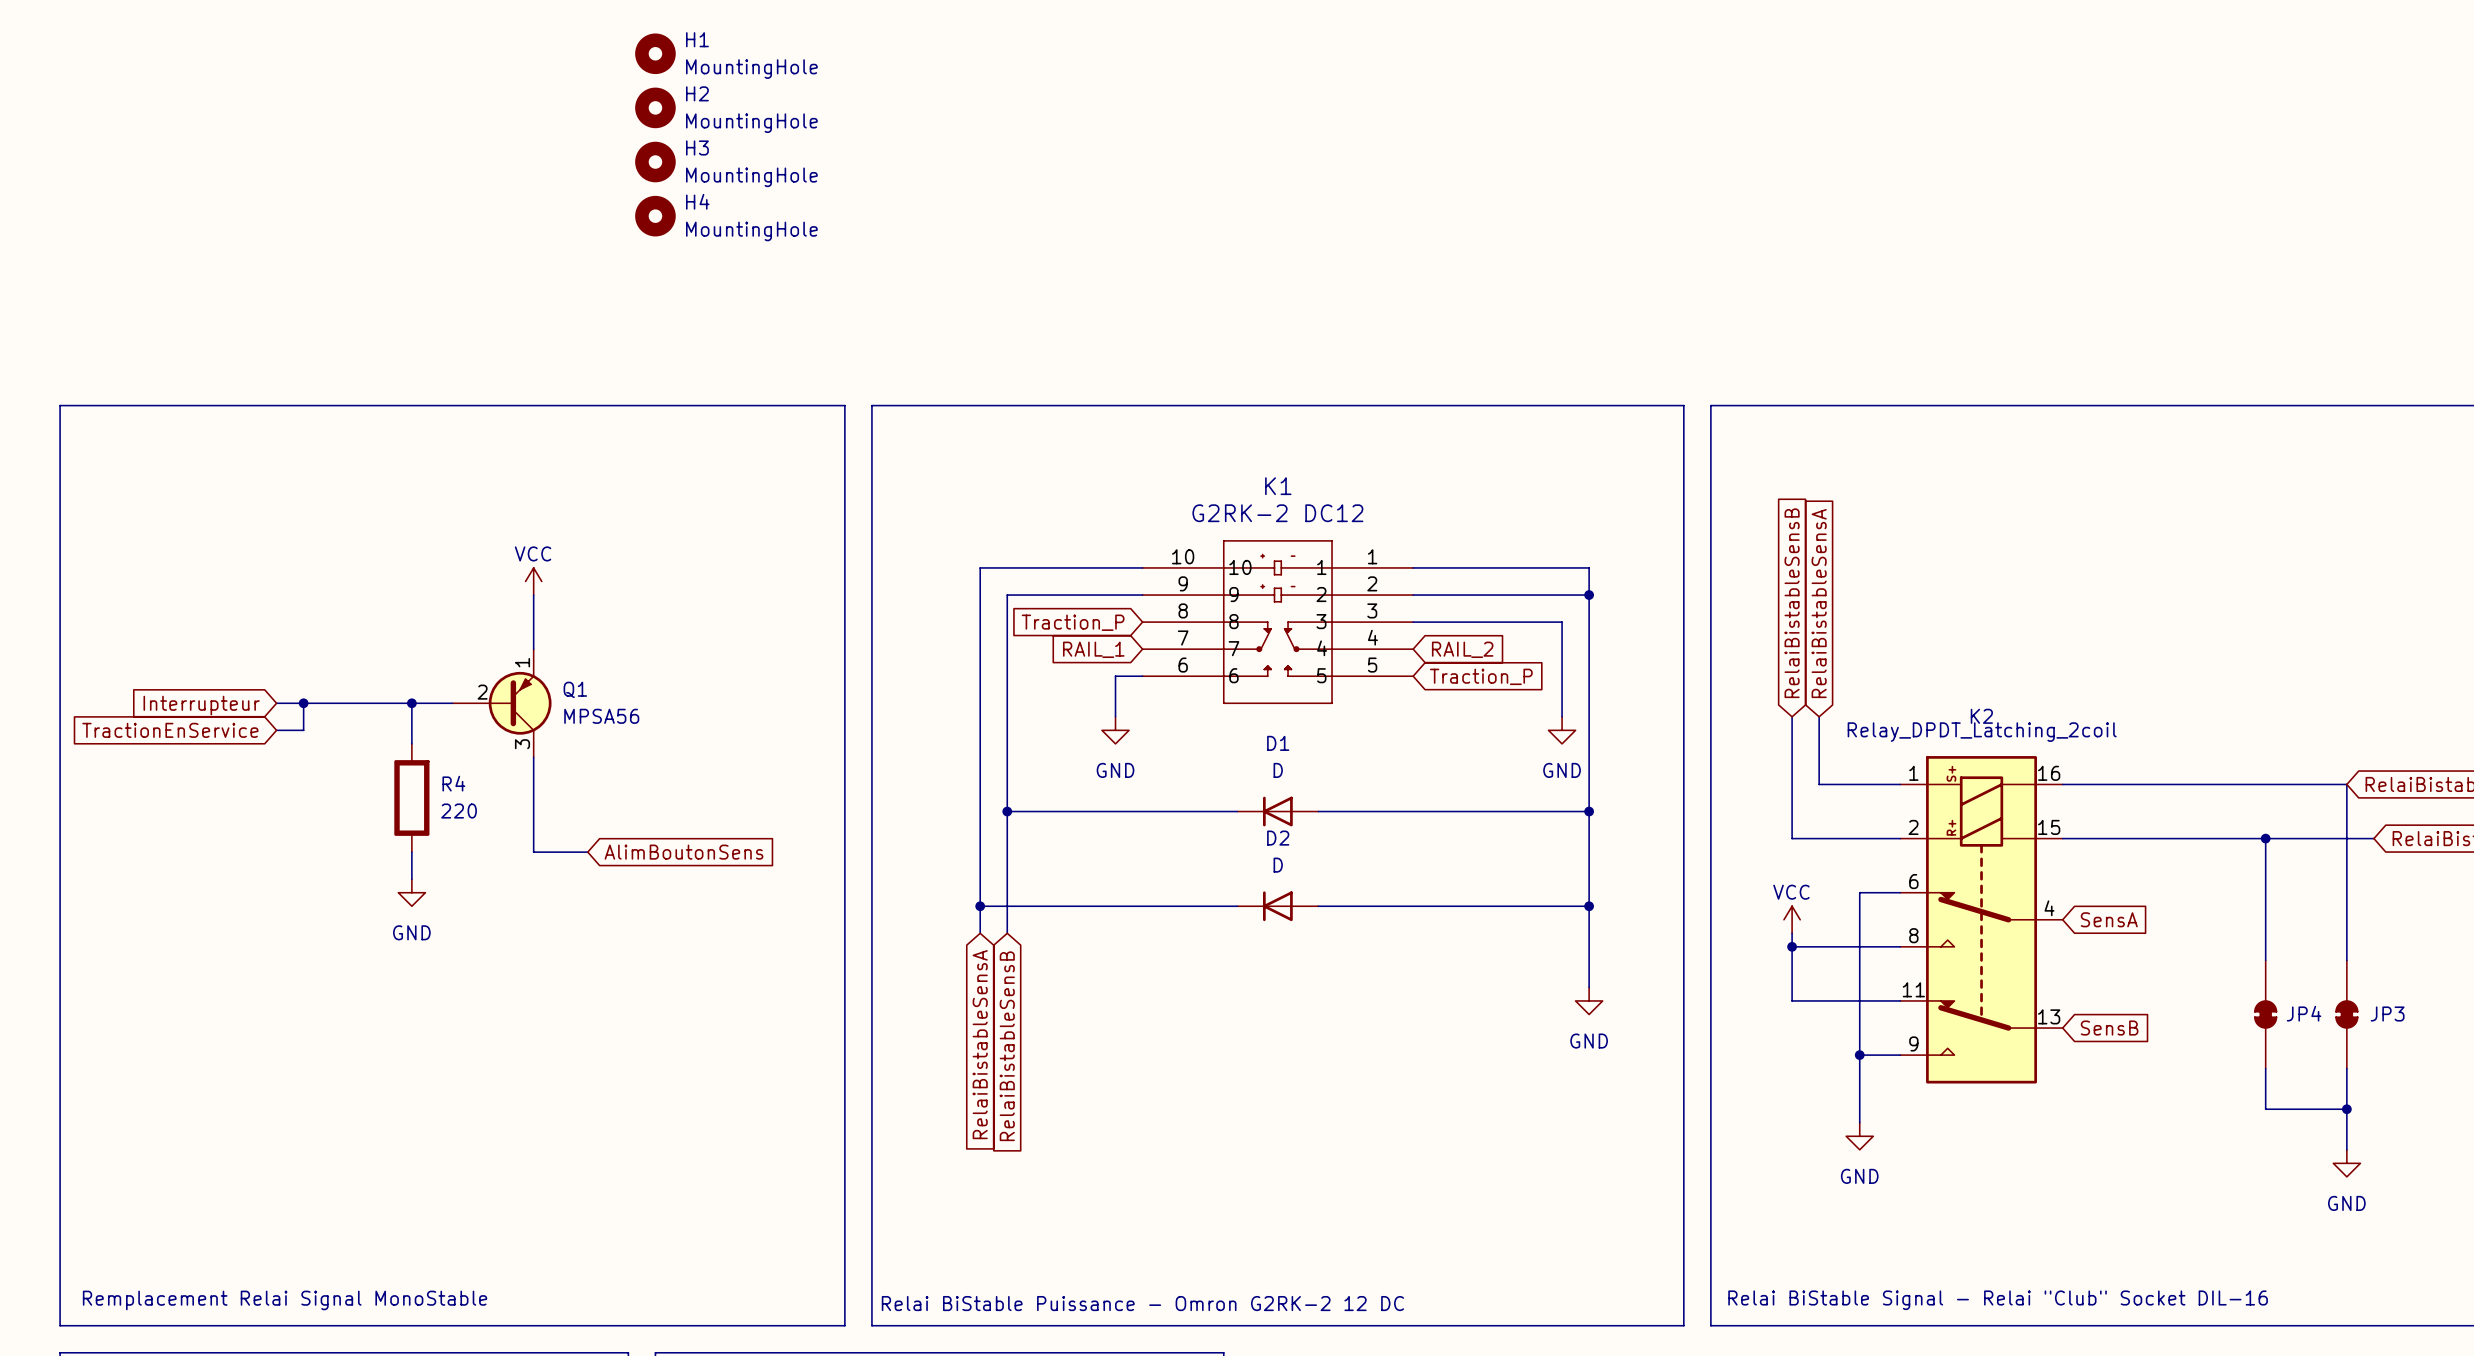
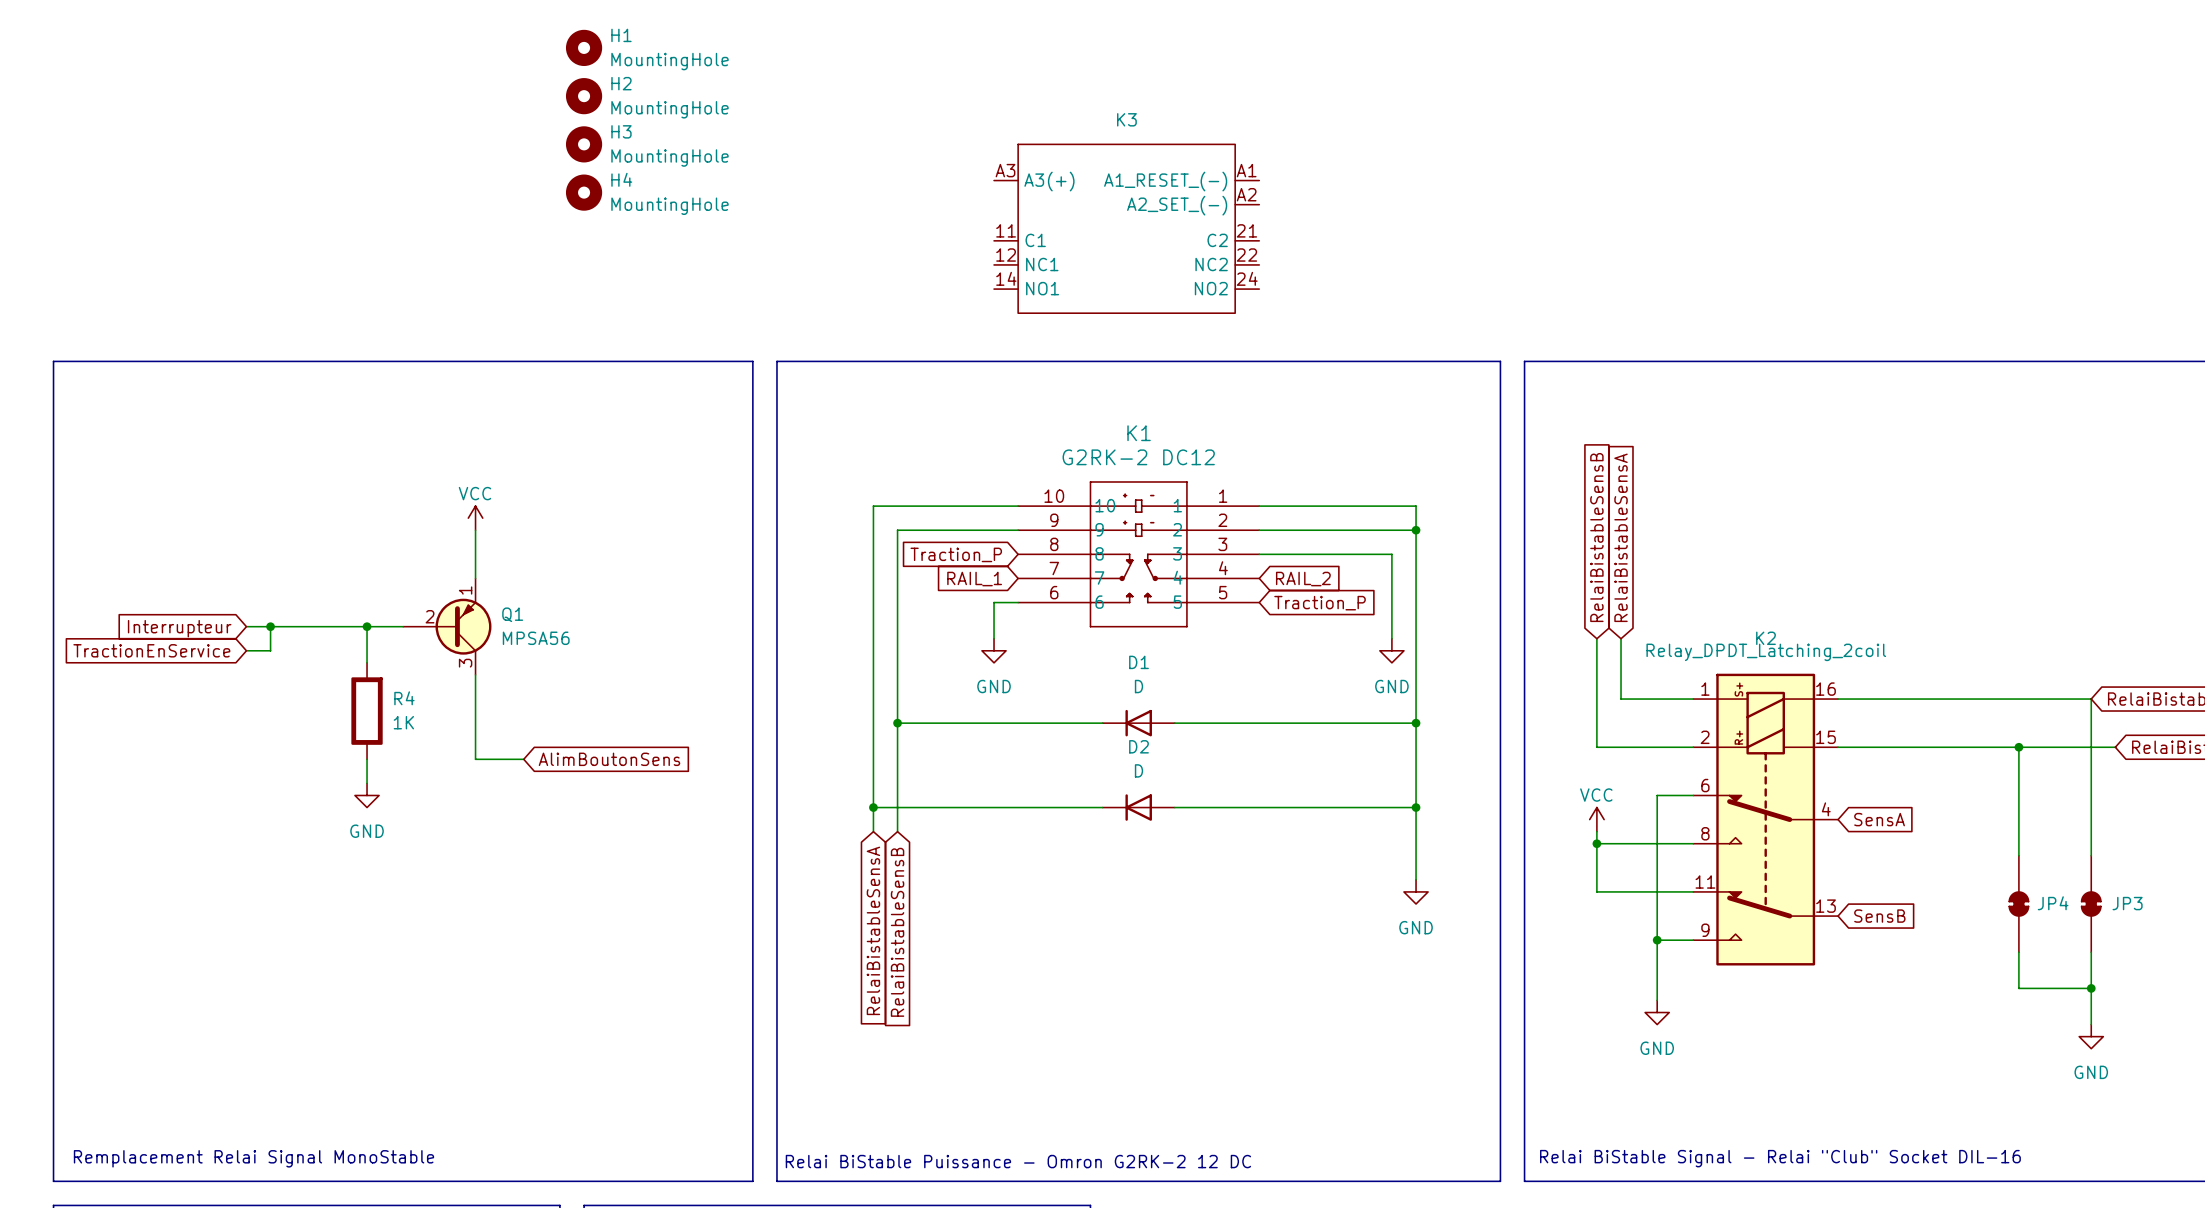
K3: none -> (1126, 228)
R4 value: 220 (459, 811) -> 1K (403, 722)

